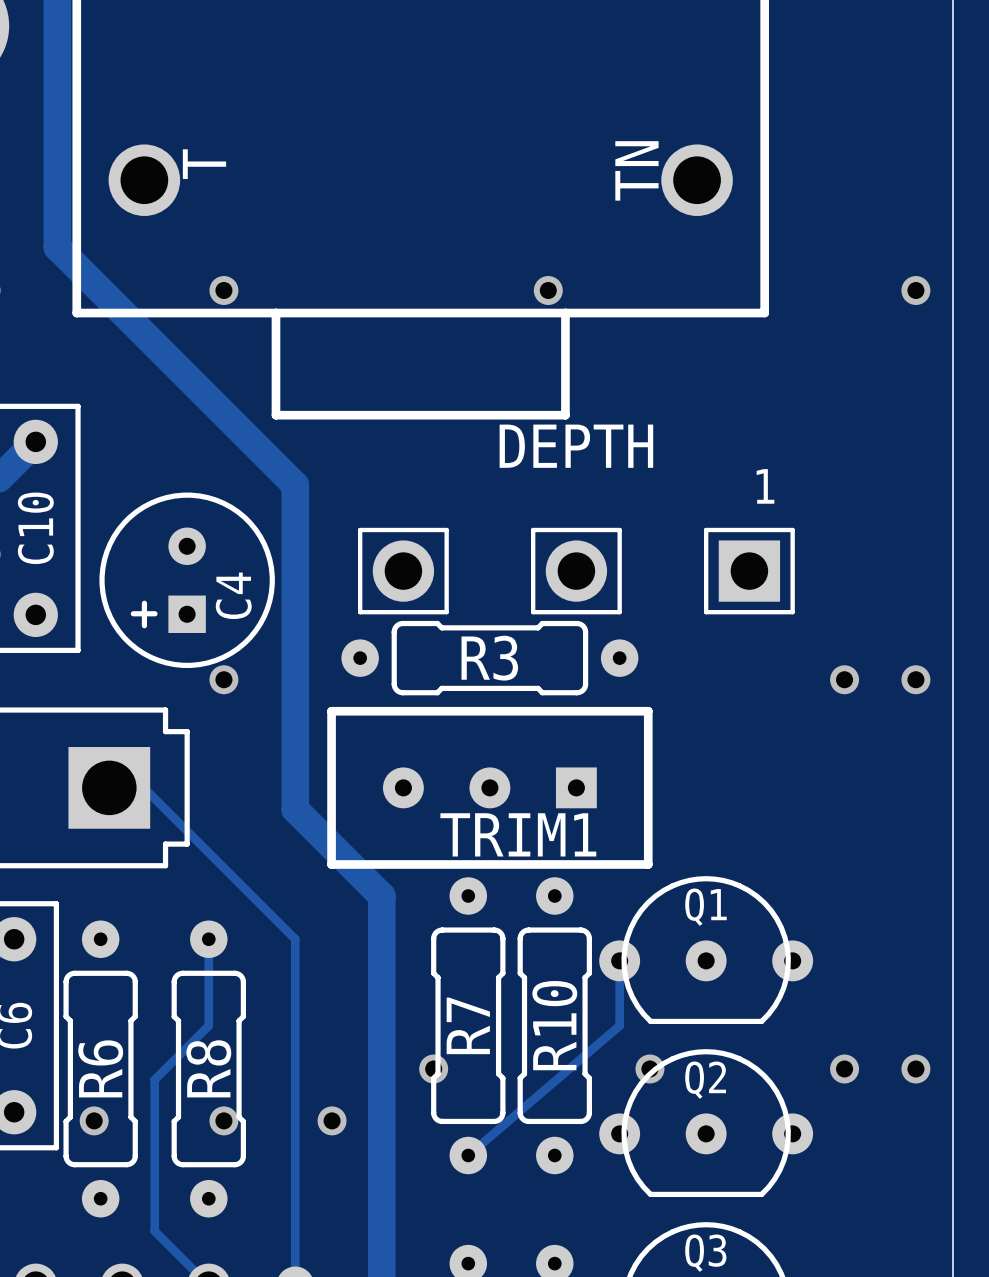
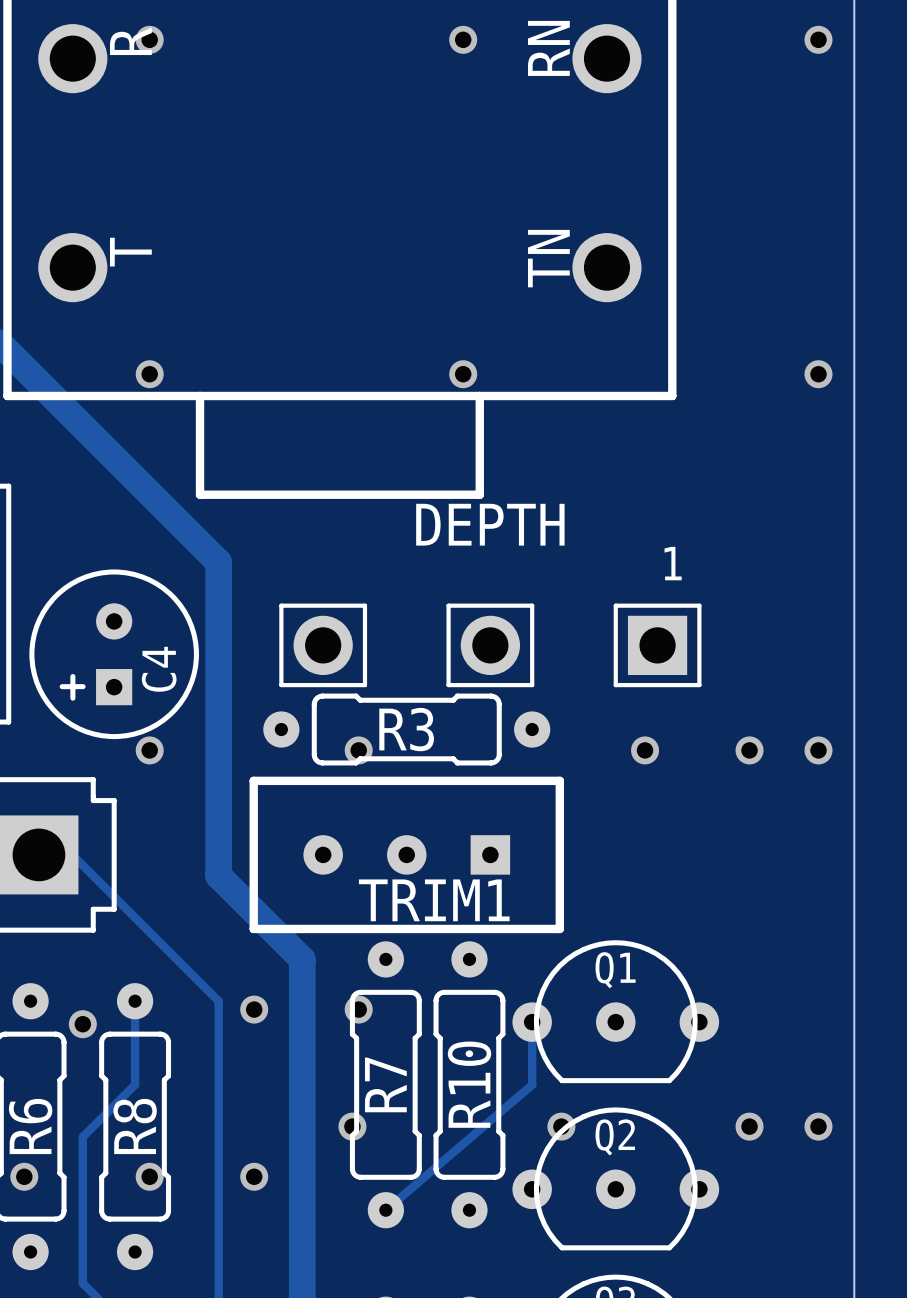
via: none -> (358, 750)
via: none -> (645, 750)
via: none -> (254, 1009)
via: none -> (358, 1009)
via: none -> (82, 1024)

